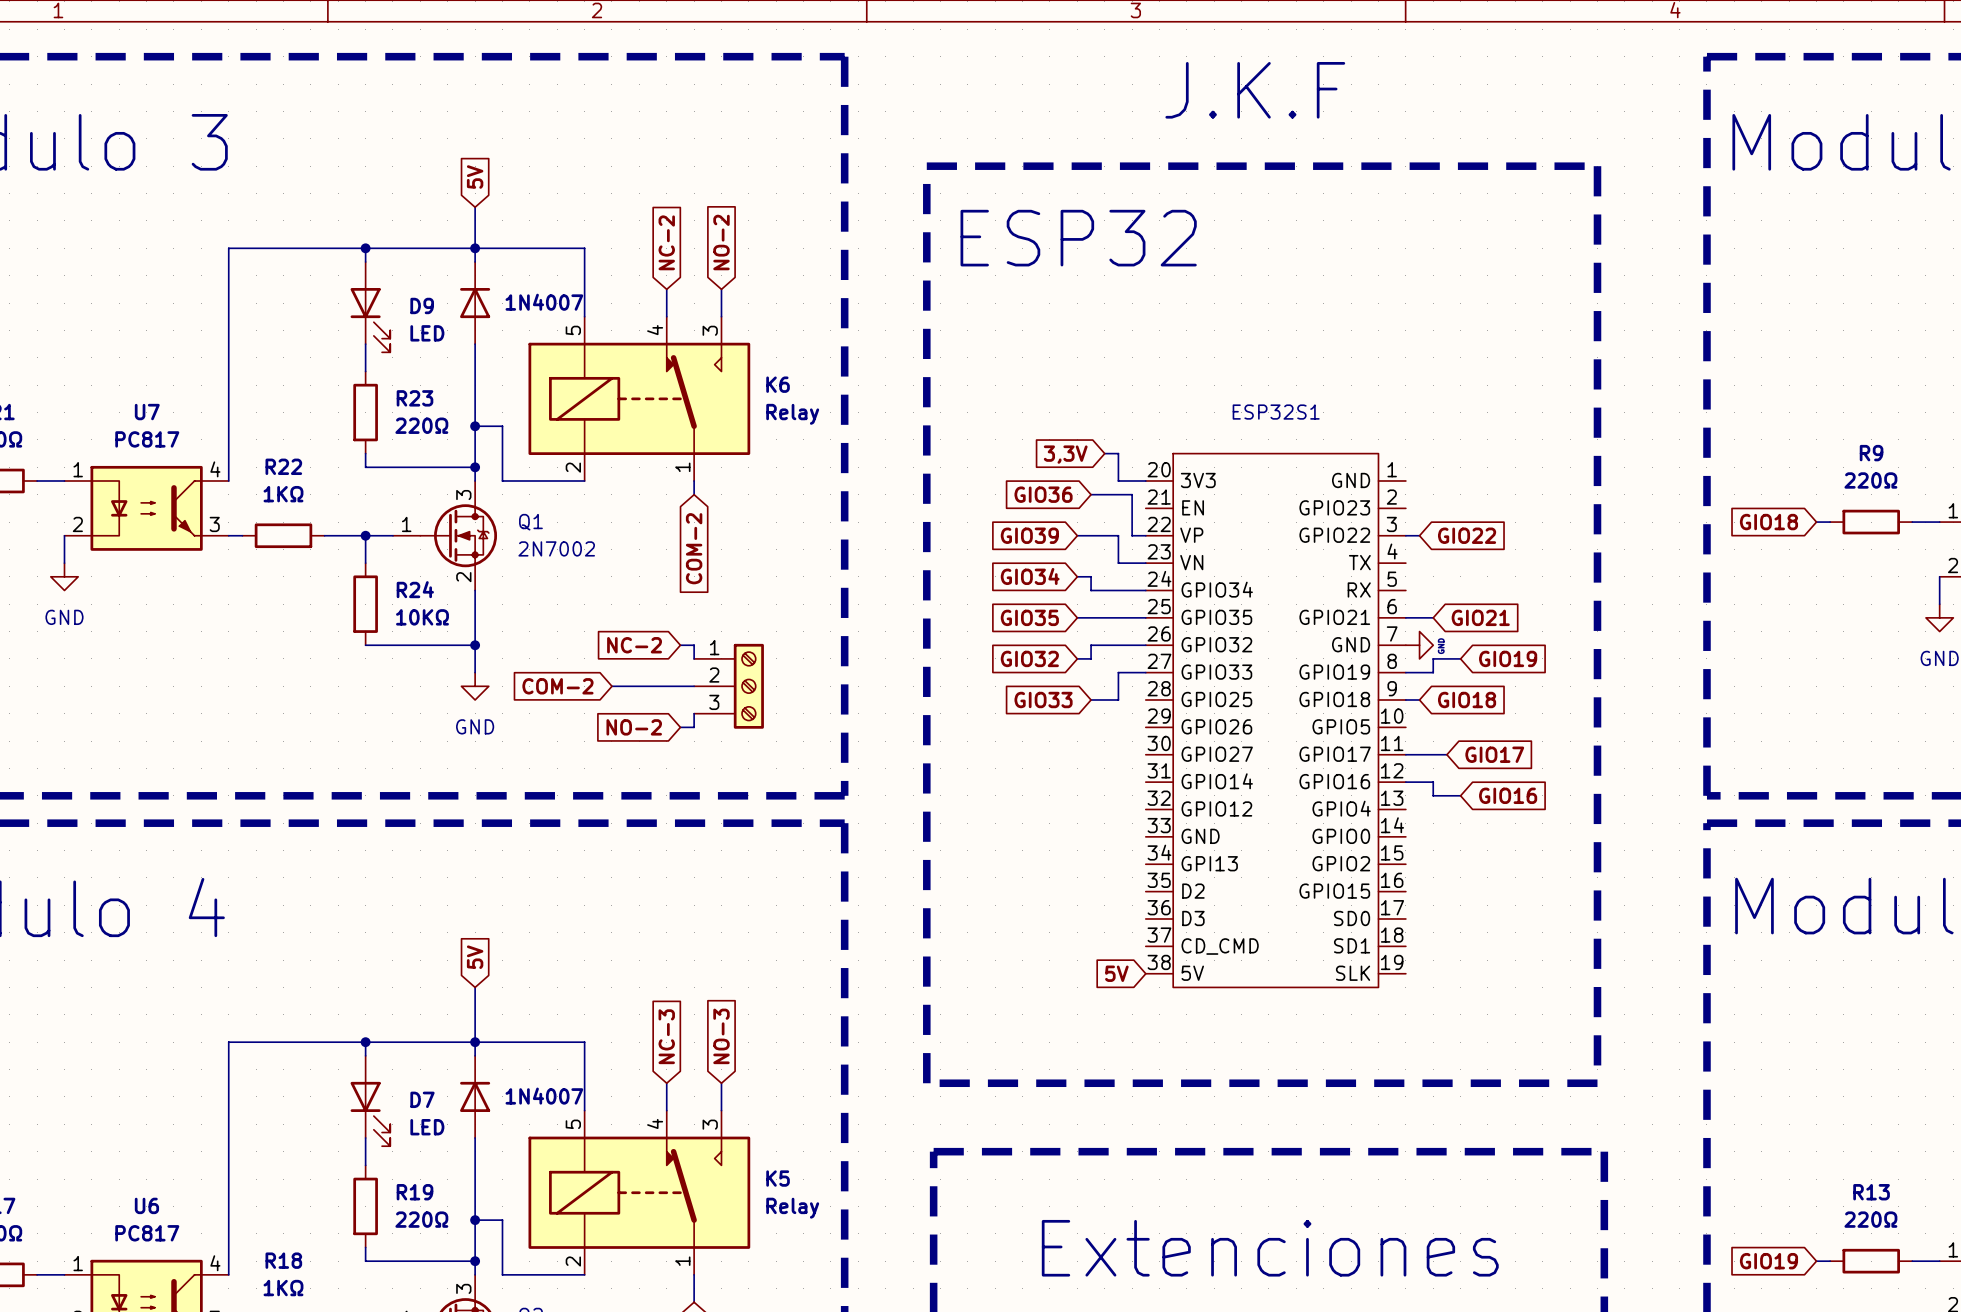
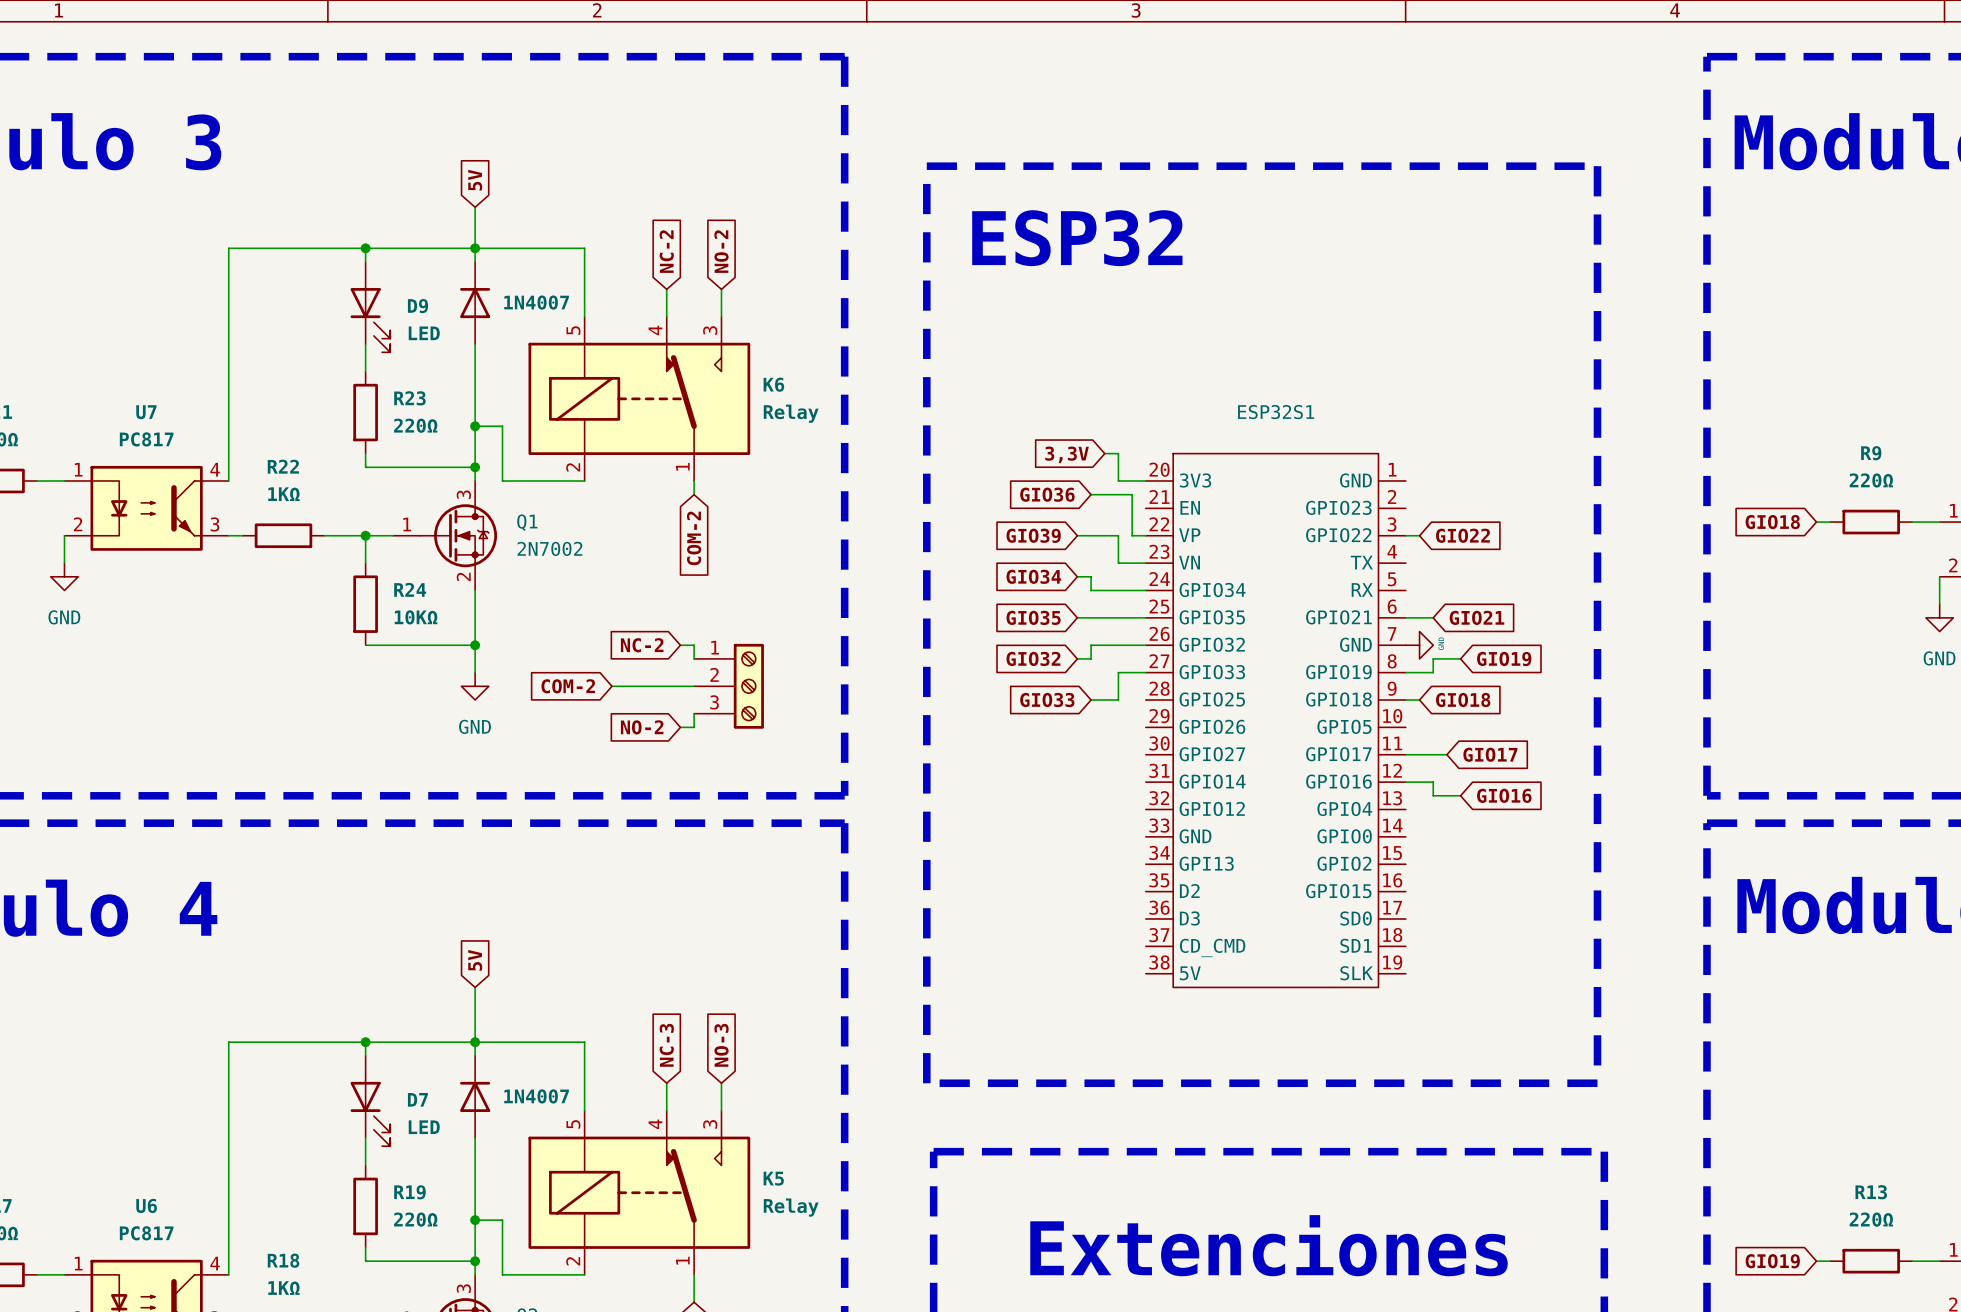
text: J.K.F (1255, 90) -> none
global label: 5V (1116, 973) -> none

